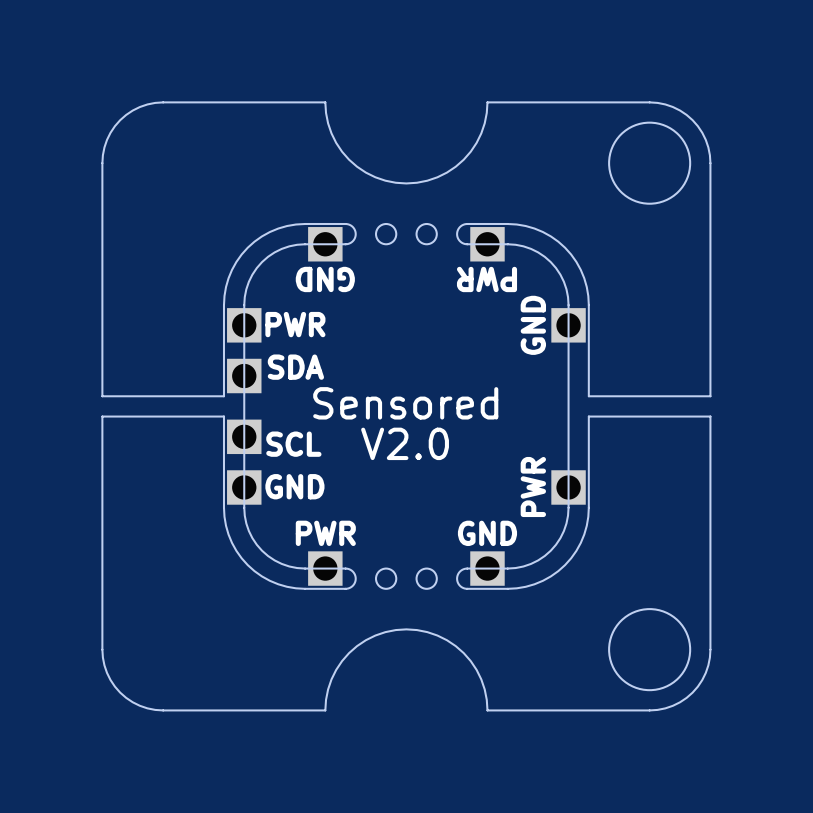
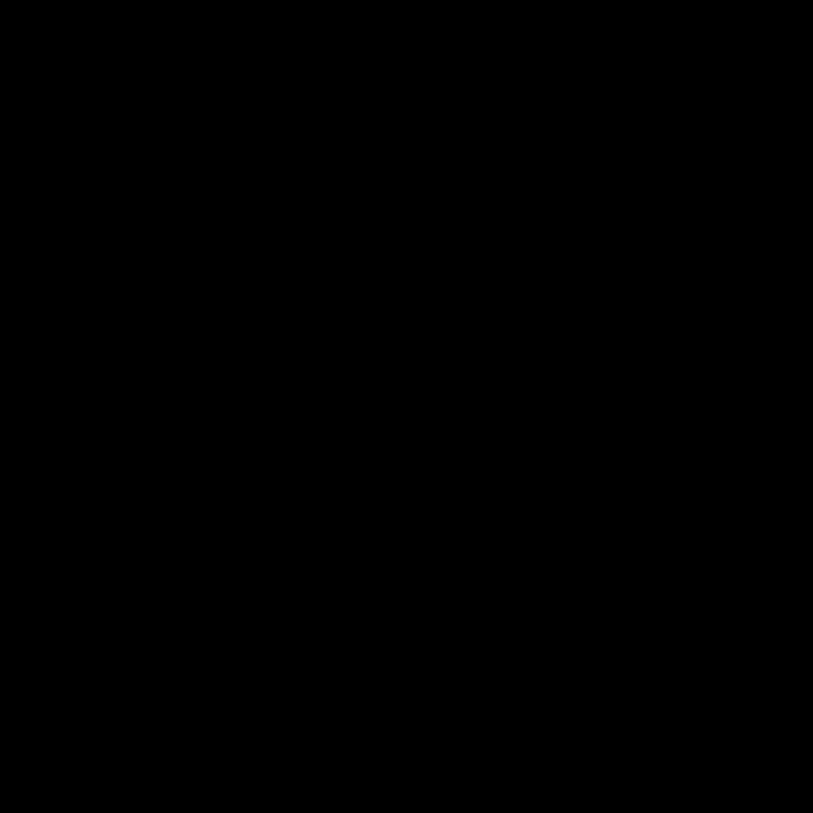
board edge: (649, 102) (487, 102) (481, 133) (463, 159) (437, 177) (406, 183) (375, 177) (349, 159) (331, 133) (325, 102) (155, 102) (139, 107) (120, 120) (107, 139) (102, 163) (102, 396) (223, 396) (224, 295) (232, 269) (241, 254) (261, 236) (287, 226) (345, 223) (354, 229) (354, 238) (348, 243) (297, 244) (274, 252) (262, 262) (248, 281) (244, 305) (244, 507) (246, 523) (252, 538) (262, 550) (274, 560) (297, 568) (348, 568) (353, 572) (355, 578) (352, 585) (346, 588) (287, 586) (261, 576) (241, 558) (228, 534) (224, 516) (223, 416) (102, 416) (102, 649) (107, 672) (120, 692) (139, 705) (155, 709) (325, 710) (331, 679) (349, 653) (375, 635) (406, 629) (437, 635) (463, 653) (481, 679) (487, 710) (657, 709) (680, 702) (692, 692) (705, 672) (710, 649) (710, 416) (588, 416) (588, 516) (584, 534) (571, 558) (550, 576) (525, 586) (465, 588) (460, 585) (457, 580) (459, 572) (464, 568) (515, 568) (538, 560) (550, 550) (560, 538) (566, 523) (568, 507) (568, 305) (563, 281) (550, 262) (531, 248) (515, 244) (462, 242) (457, 234) (461, 226) (467, 223) (525, 226) (550, 236) (571, 254) (580, 269) (588, 295) (588, 396) (710, 396) (710, 163) (708, 147) (697, 126) (686, 114) (665, 104) (649, 102) -> none
round board edge: [608, 121, 692, 205] -> none
round board edge: [374, 222, 398, 246] -> none
round board edge: [415, 222, 438, 246] -> none
part: GND (325, 244) -> none
part: PWR (487, 244) -> none
part: PWR (244, 325) -> none
part: GND (568, 325) -> none
part: SDA (244, 376) -> none
text: Sensored (405, 403) -> none
part: SCL (244, 436) -> none
text: V2.0 (405, 443) -> none
part: GND (244, 487) -> none
part: PWR (568, 487) -> none
round board edge: [374, 567, 398, 590] -> none
round board edge: [415, 567, 438, 590] -> none
part: PWR (325, 568) -> none
part: GND (487, 568) -> none
round board edge: [608, 608, 692, 692] -> none

